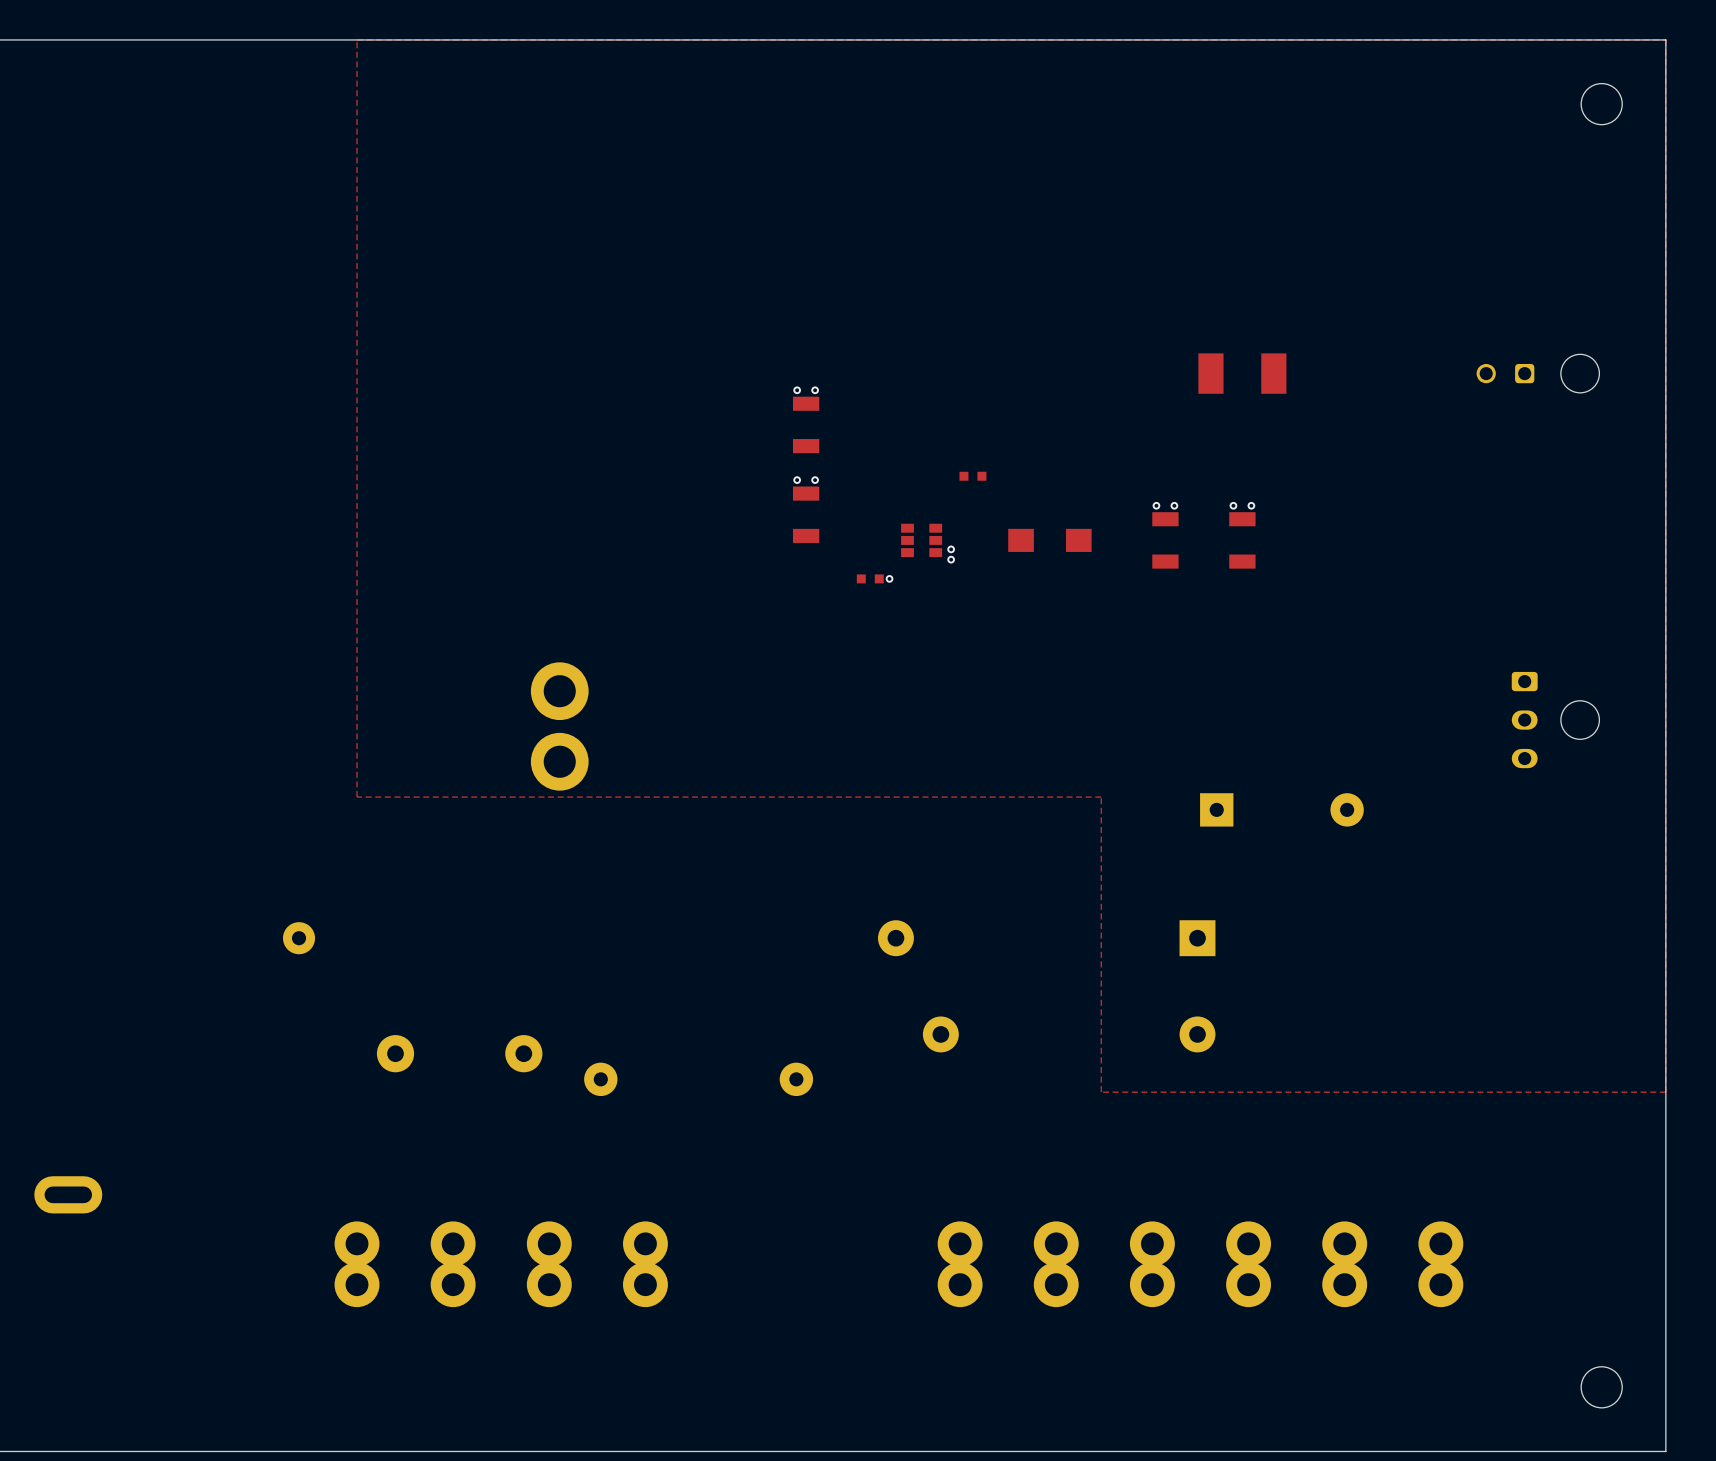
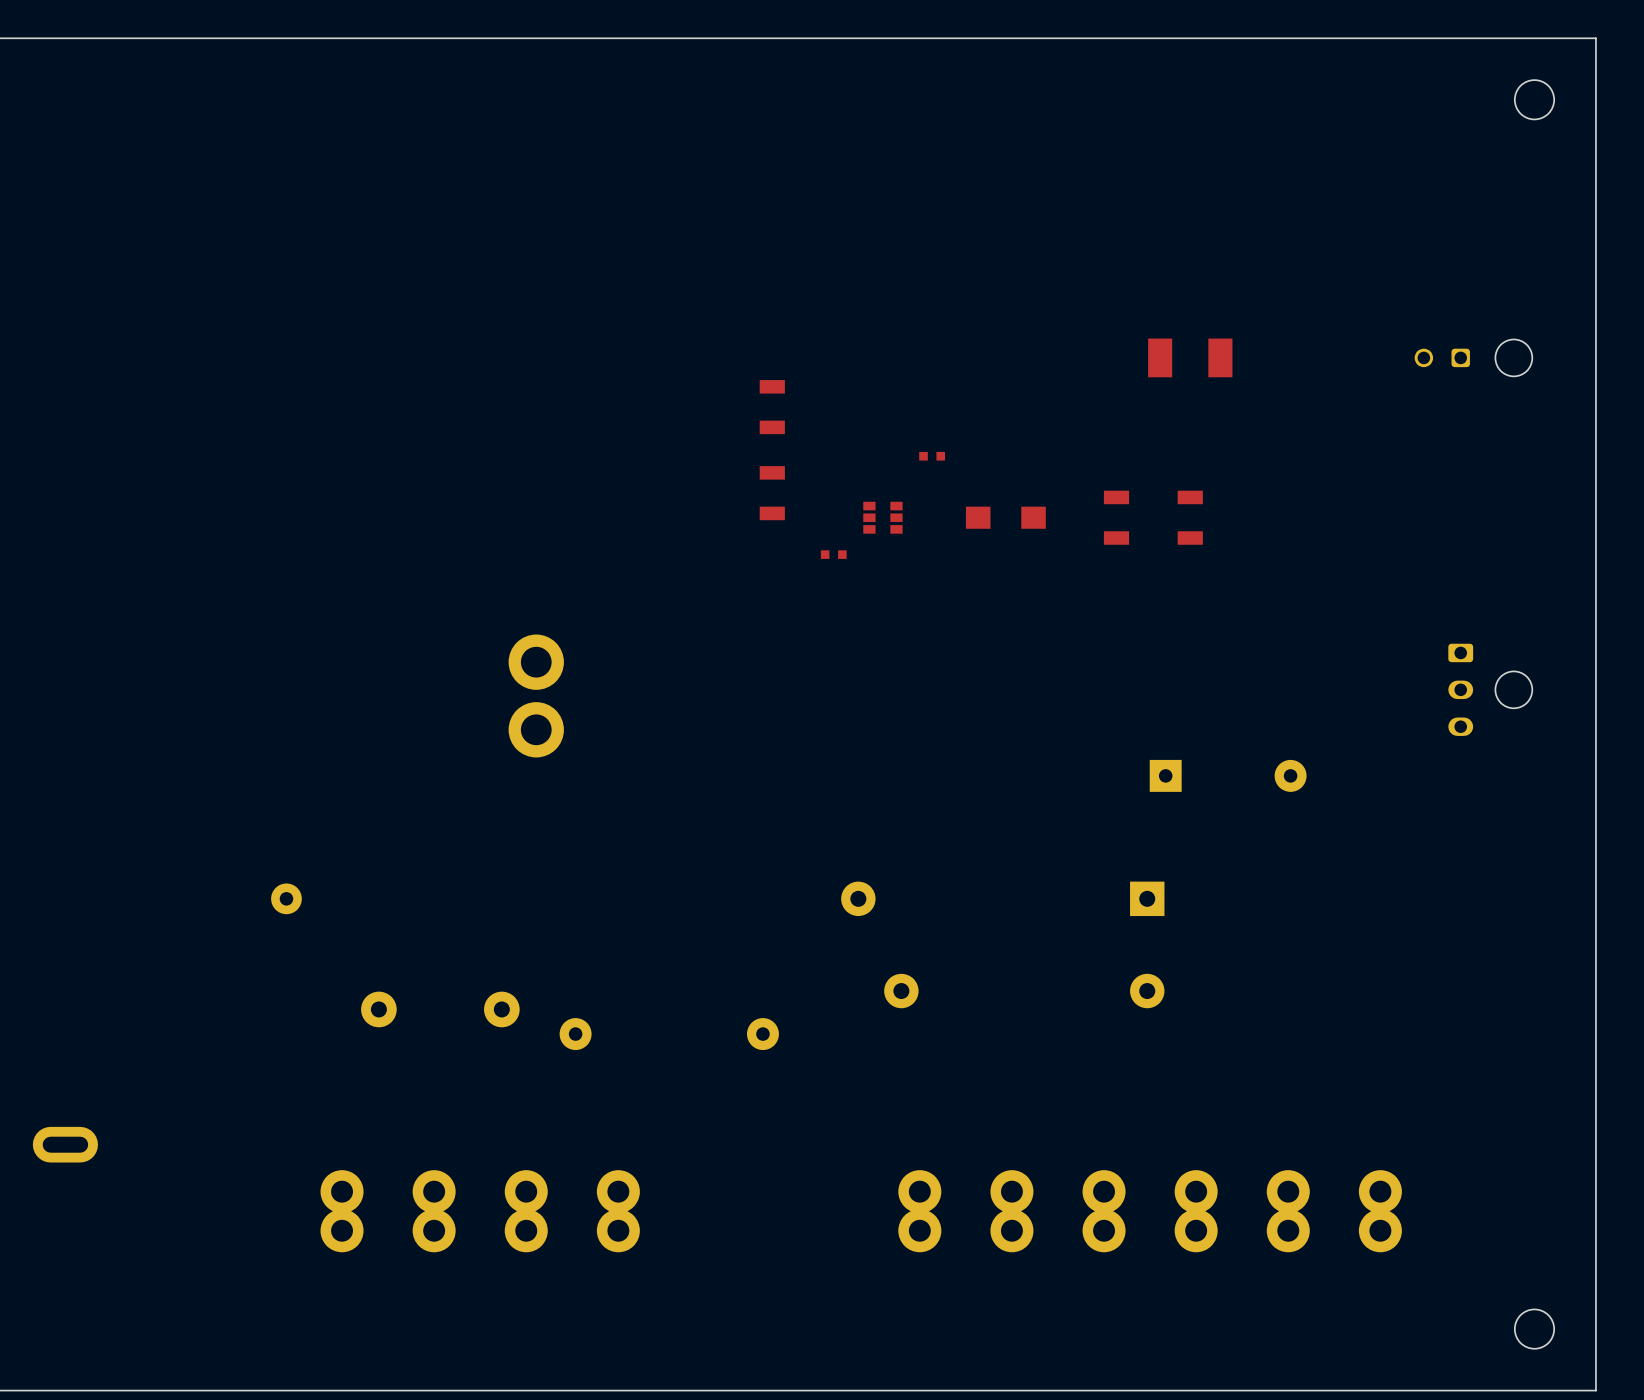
zone outline: (357, 39) (1665, 39) (1665, 1092) (1101, 1092) (1101, 797) (357, 797) (357, 39) -> none
via: (797, 390) -> none
via: (815, 390) -> none
via: (797, 480) -> none
via: (815, 480) -> none
via: (1156, 505) -> none
via: (1174, 505) -> none
via: (1233, 505) -> none
via: (1251, 505) -> none
via: (951, 549) -> none
via: (951, 559) -> none
via: (889, 578) -> none

